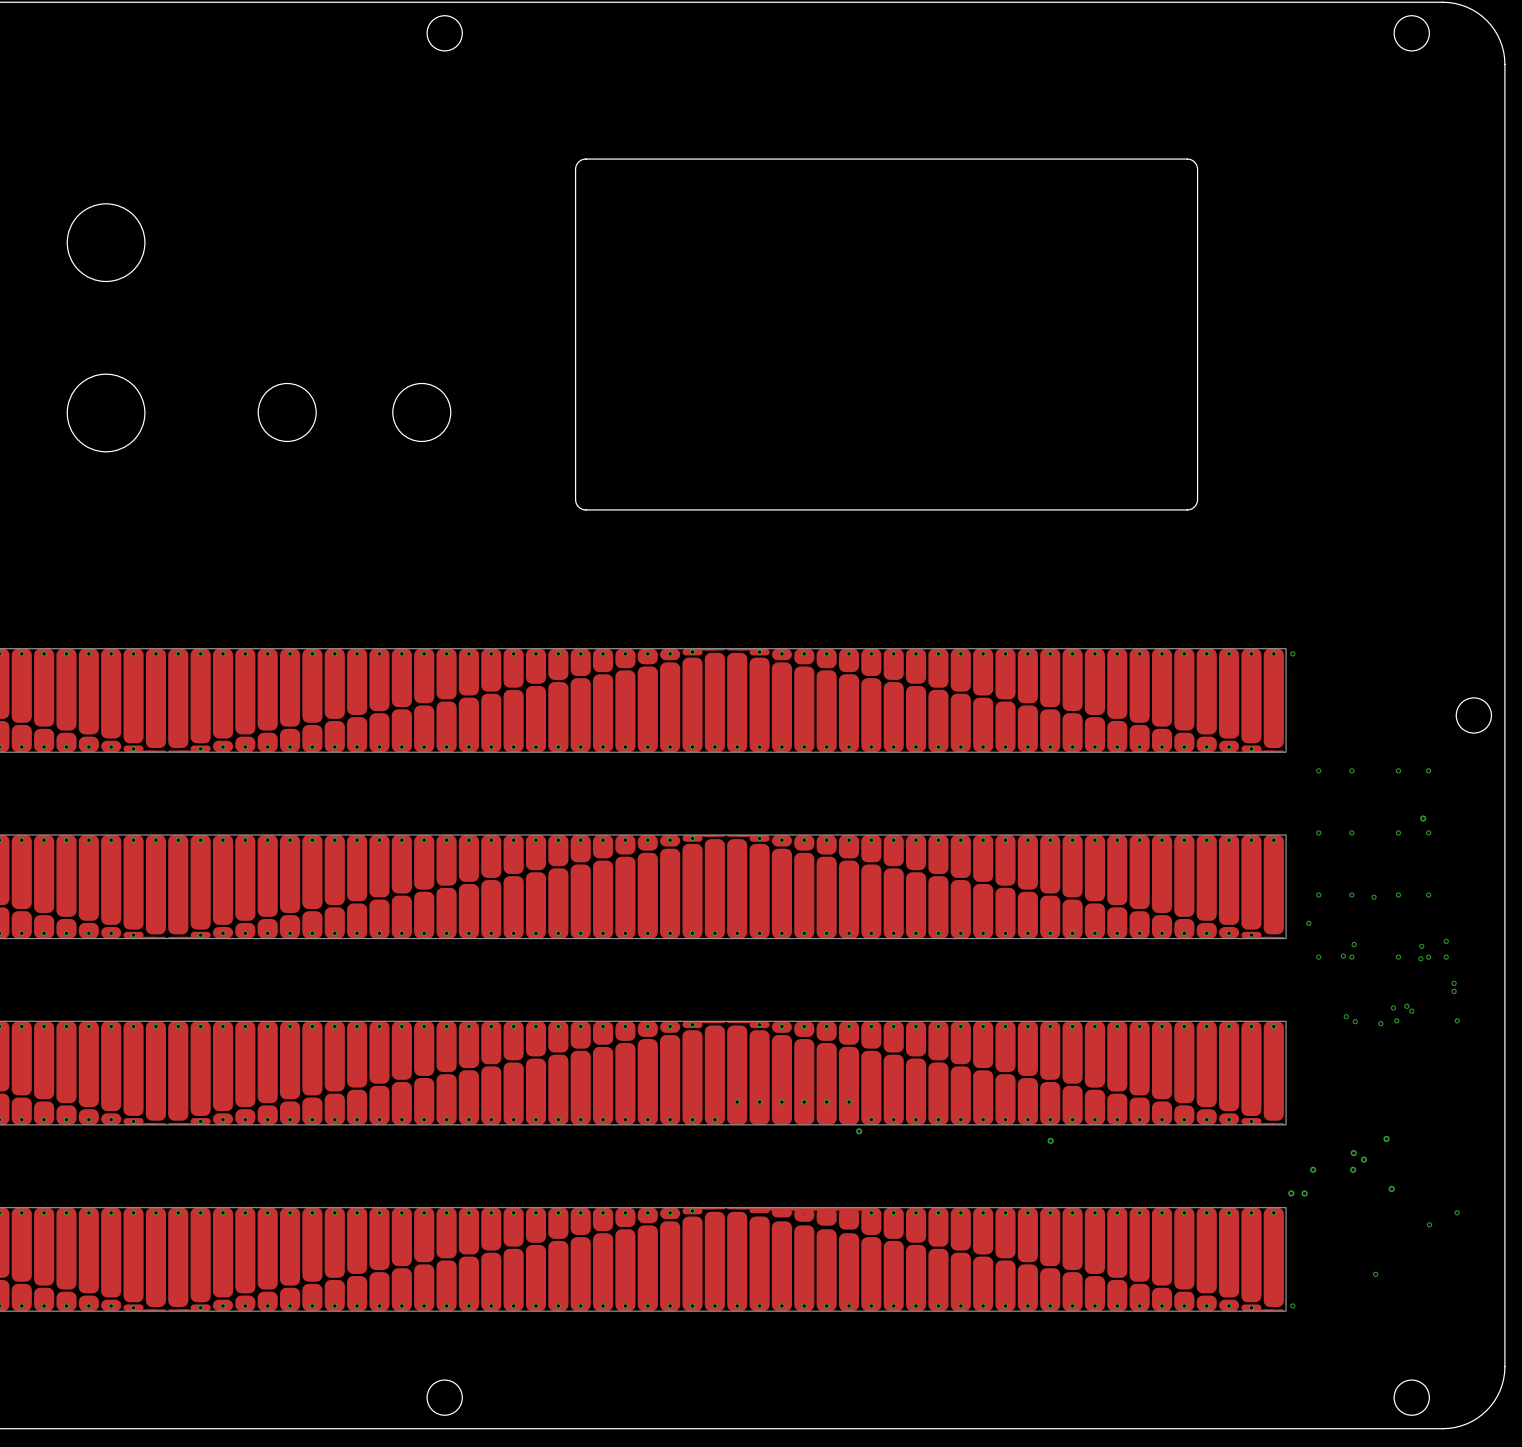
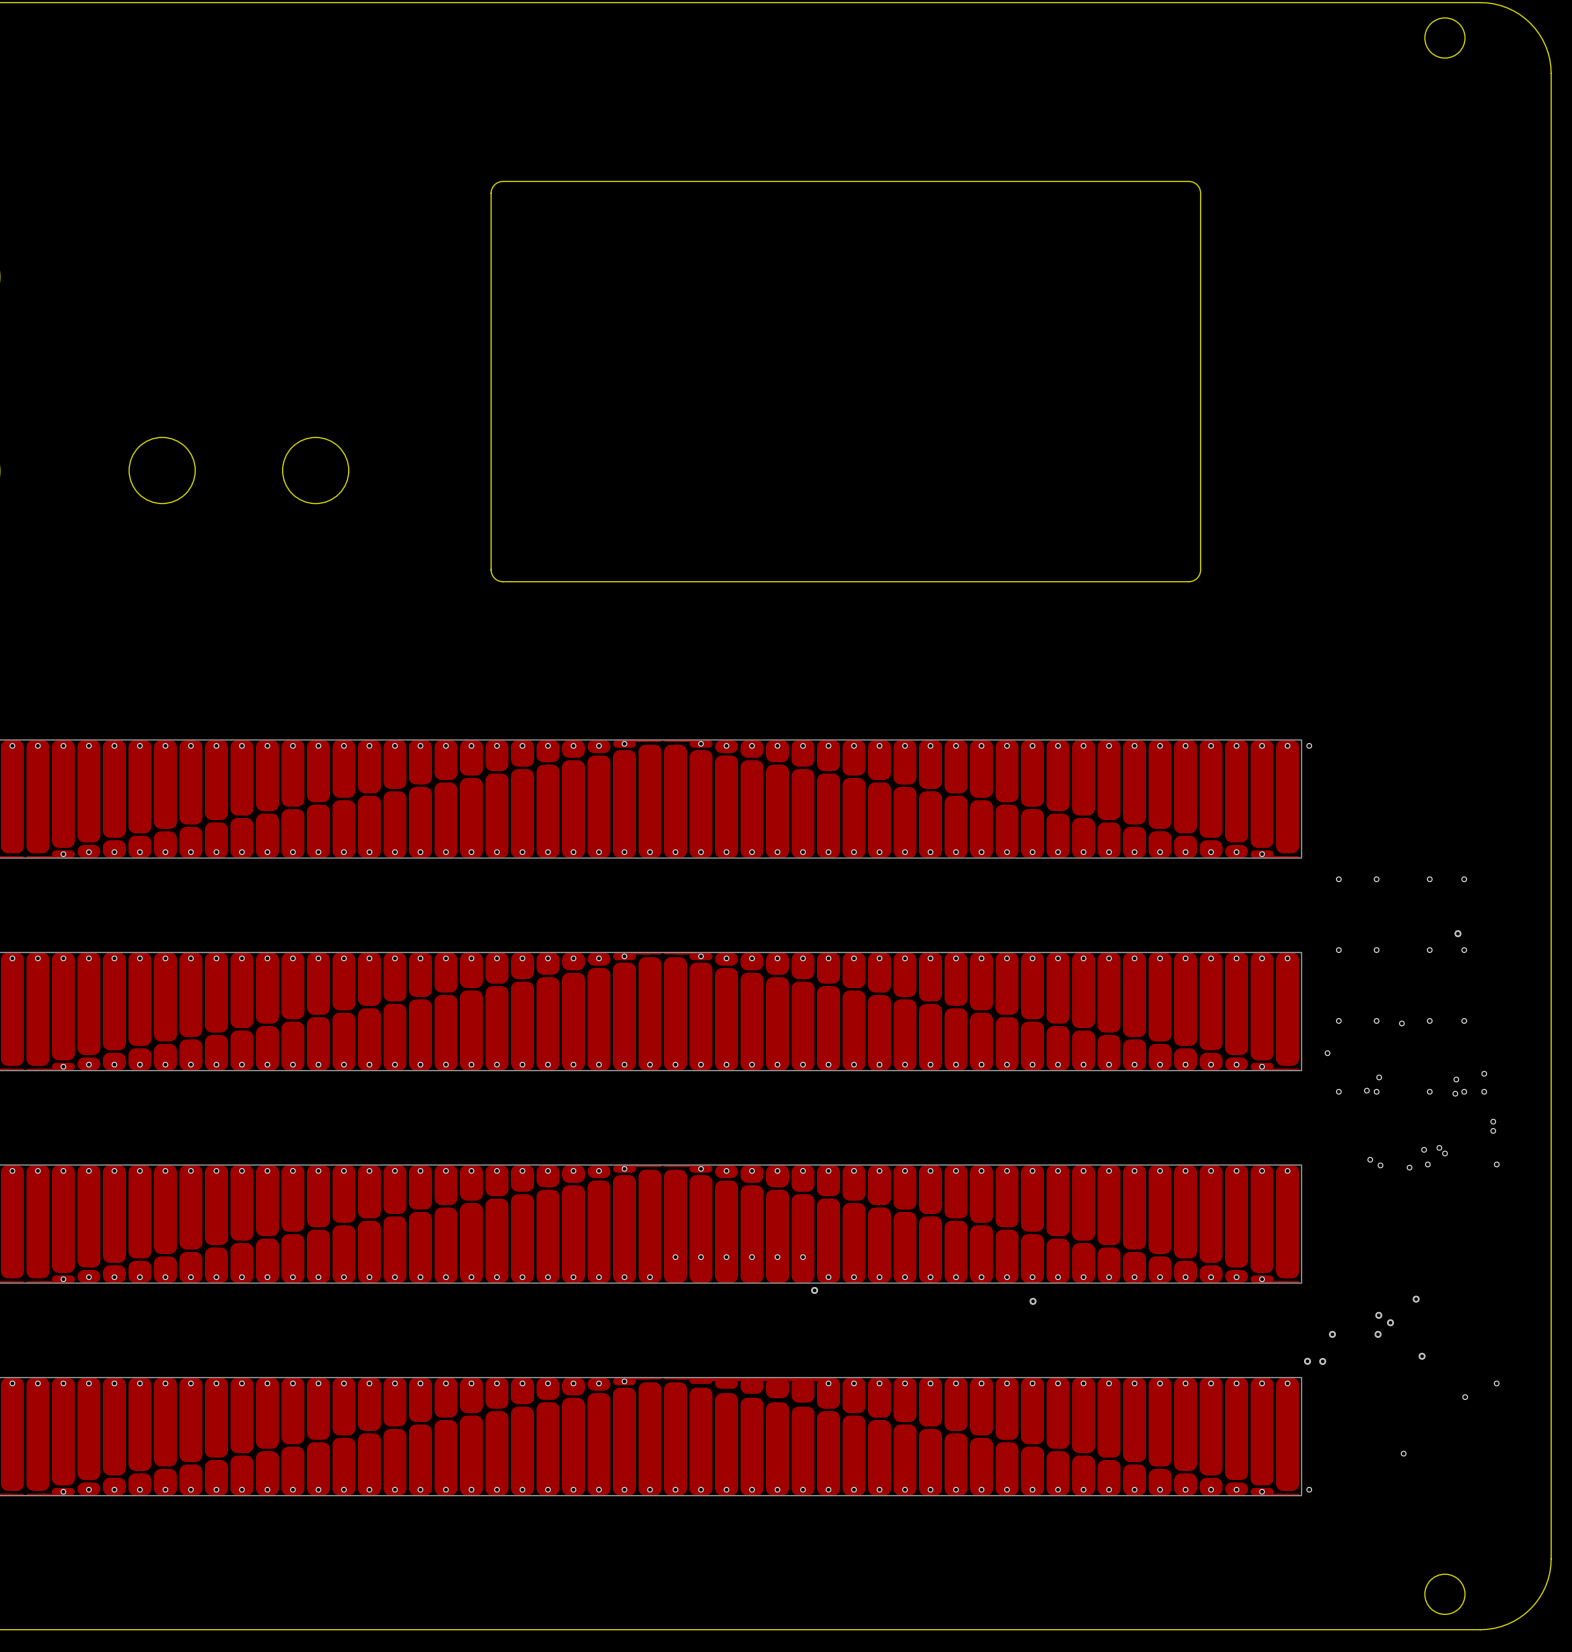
round board edge: [426, 15, 463, 52] -> none
round board edge: [1455, 697, 1492, 734] -> none
round board edge: [426, 1379, 463, 1416] -> none

